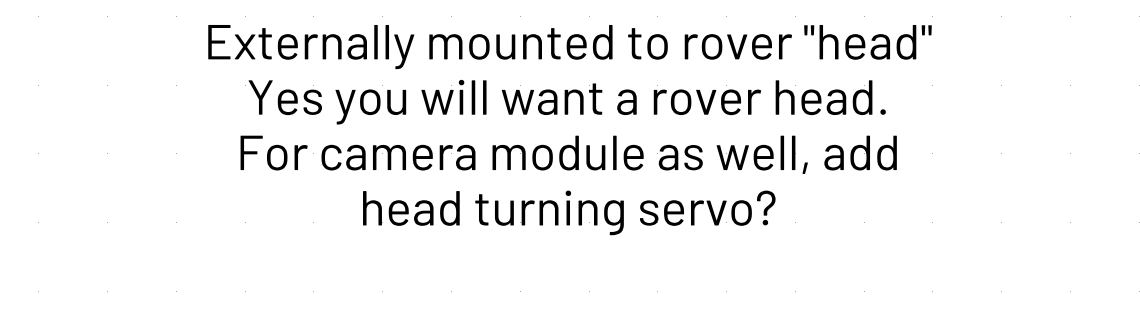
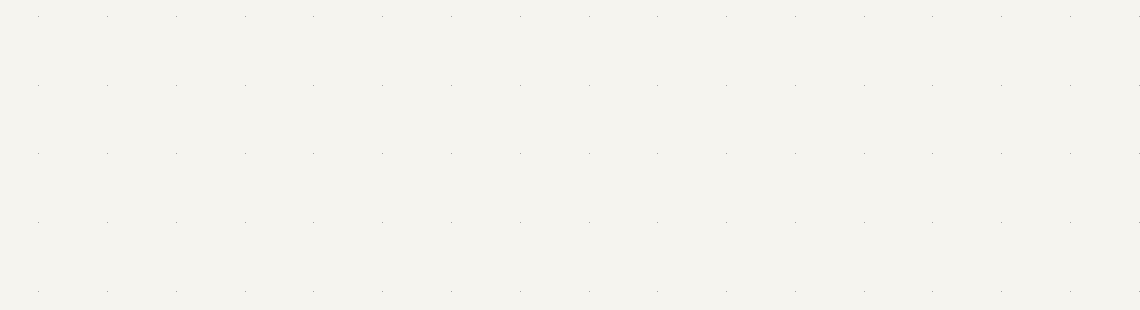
text: Externally mounted to rover "head" (570, 47) -> none
text: Yes you will want a rover head. (567, 102) -> none
text: For camera module as well, add (568, 154) -> none
text: head turning servo? (569, 212) -> none

